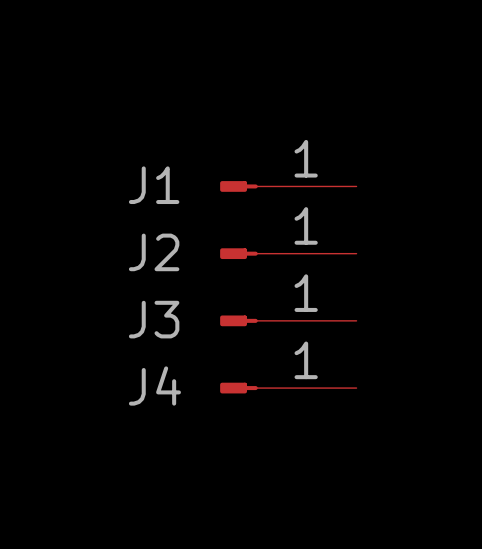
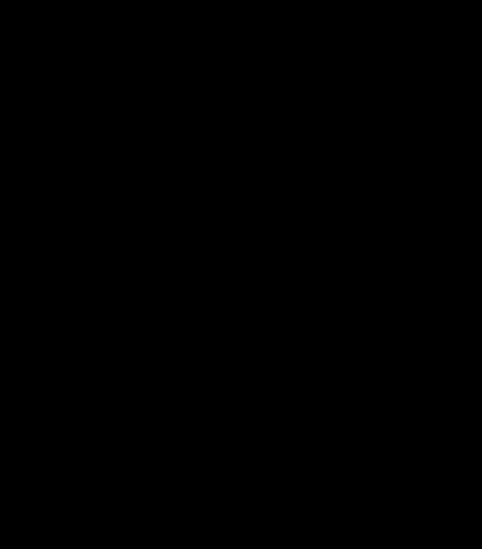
J1: (288, 186) -> none
J2: (288, 253) -> none
J3: (288, 320) -> none
J4: (288, 388) -> none

